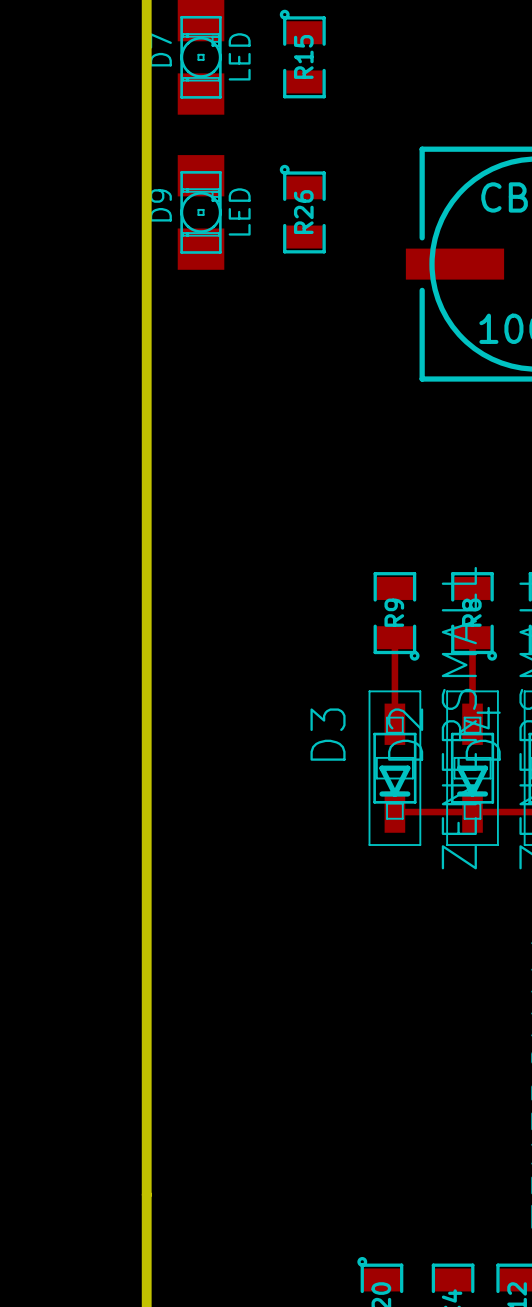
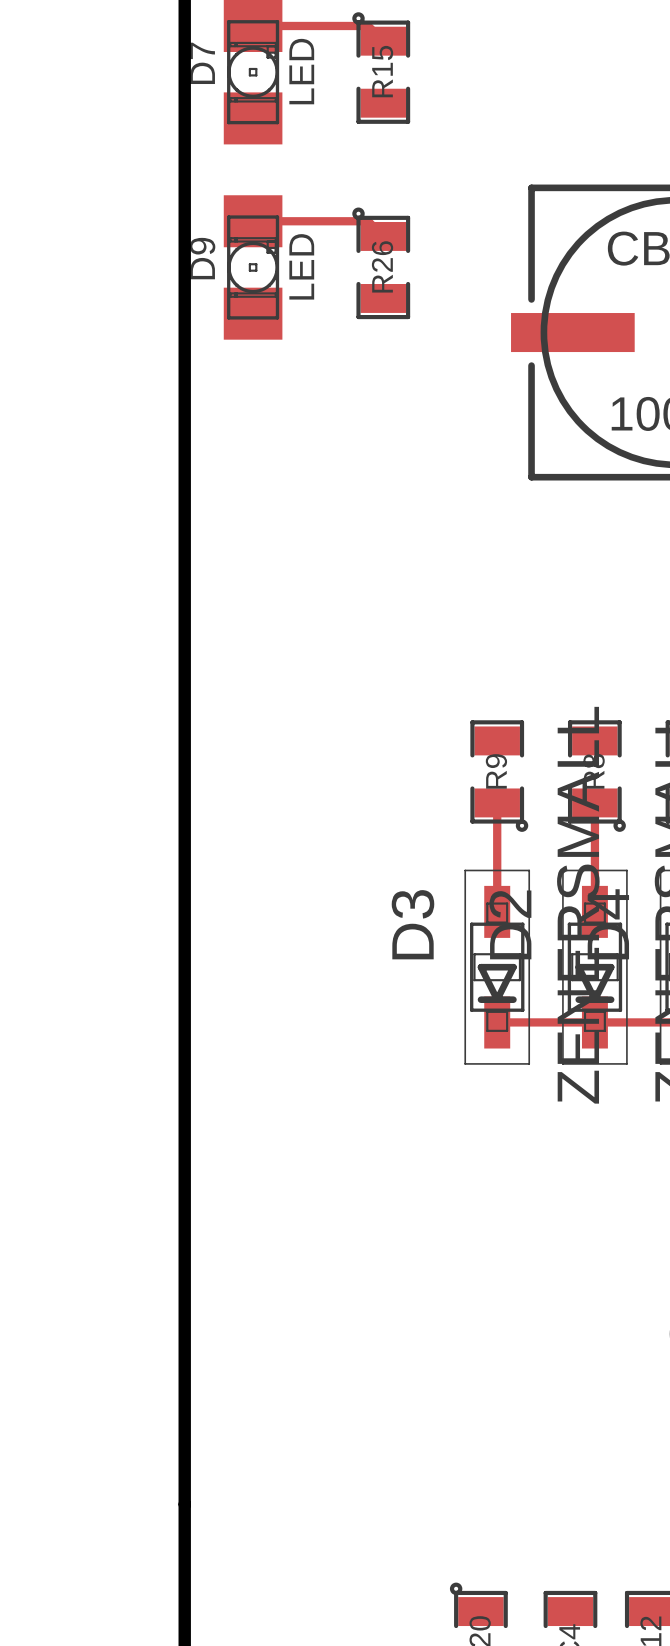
track: none -> (253, 25) (368, 25) (383, 41)
track: none -> (253, 221) (368, 221) (383, 236)

